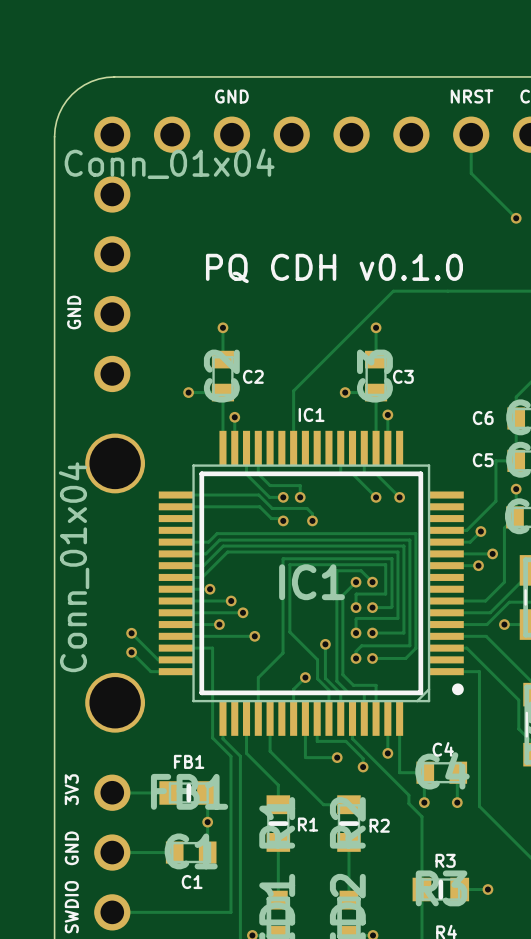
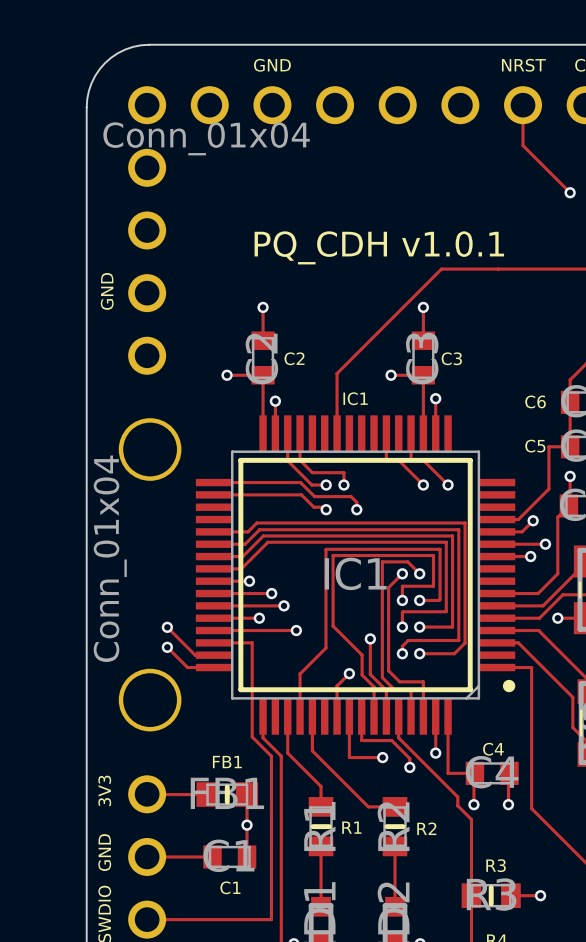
text: PQ CDH v0.1.0 (334, 268) -> PQ_CDH v1.0.1 (379, 247)

